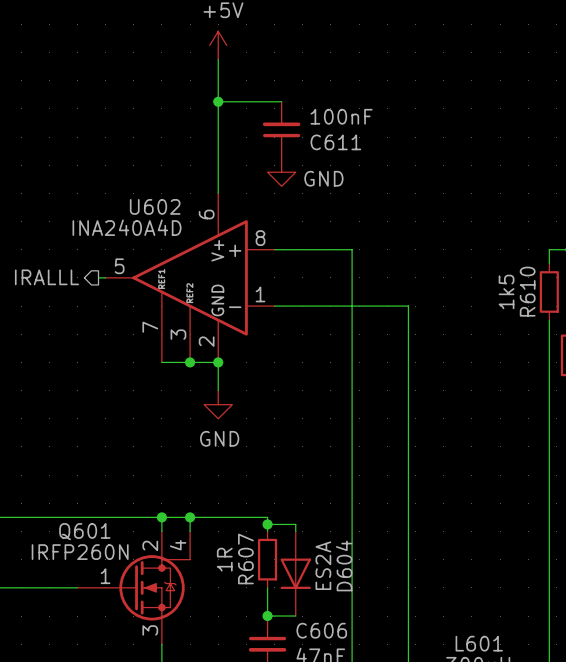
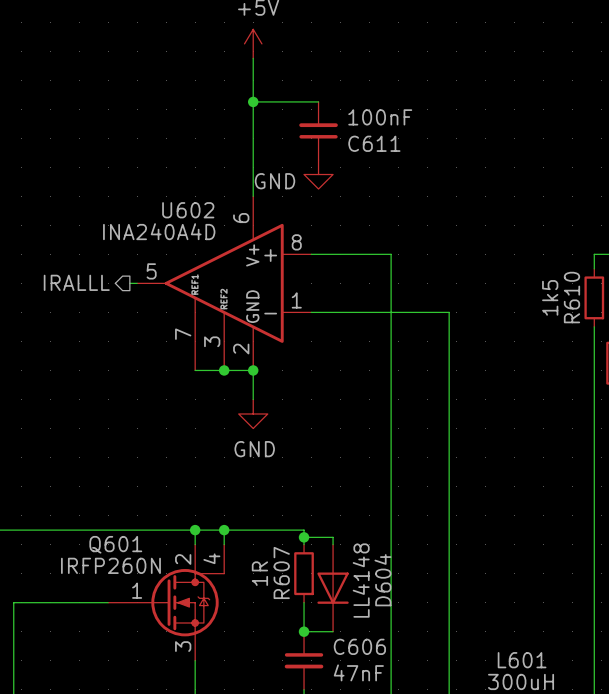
power symbol text position: GND (323, 178) -> GND (274, 181)
D604 value: ES2A (323, 565) -> LL4148 (361, 580)

